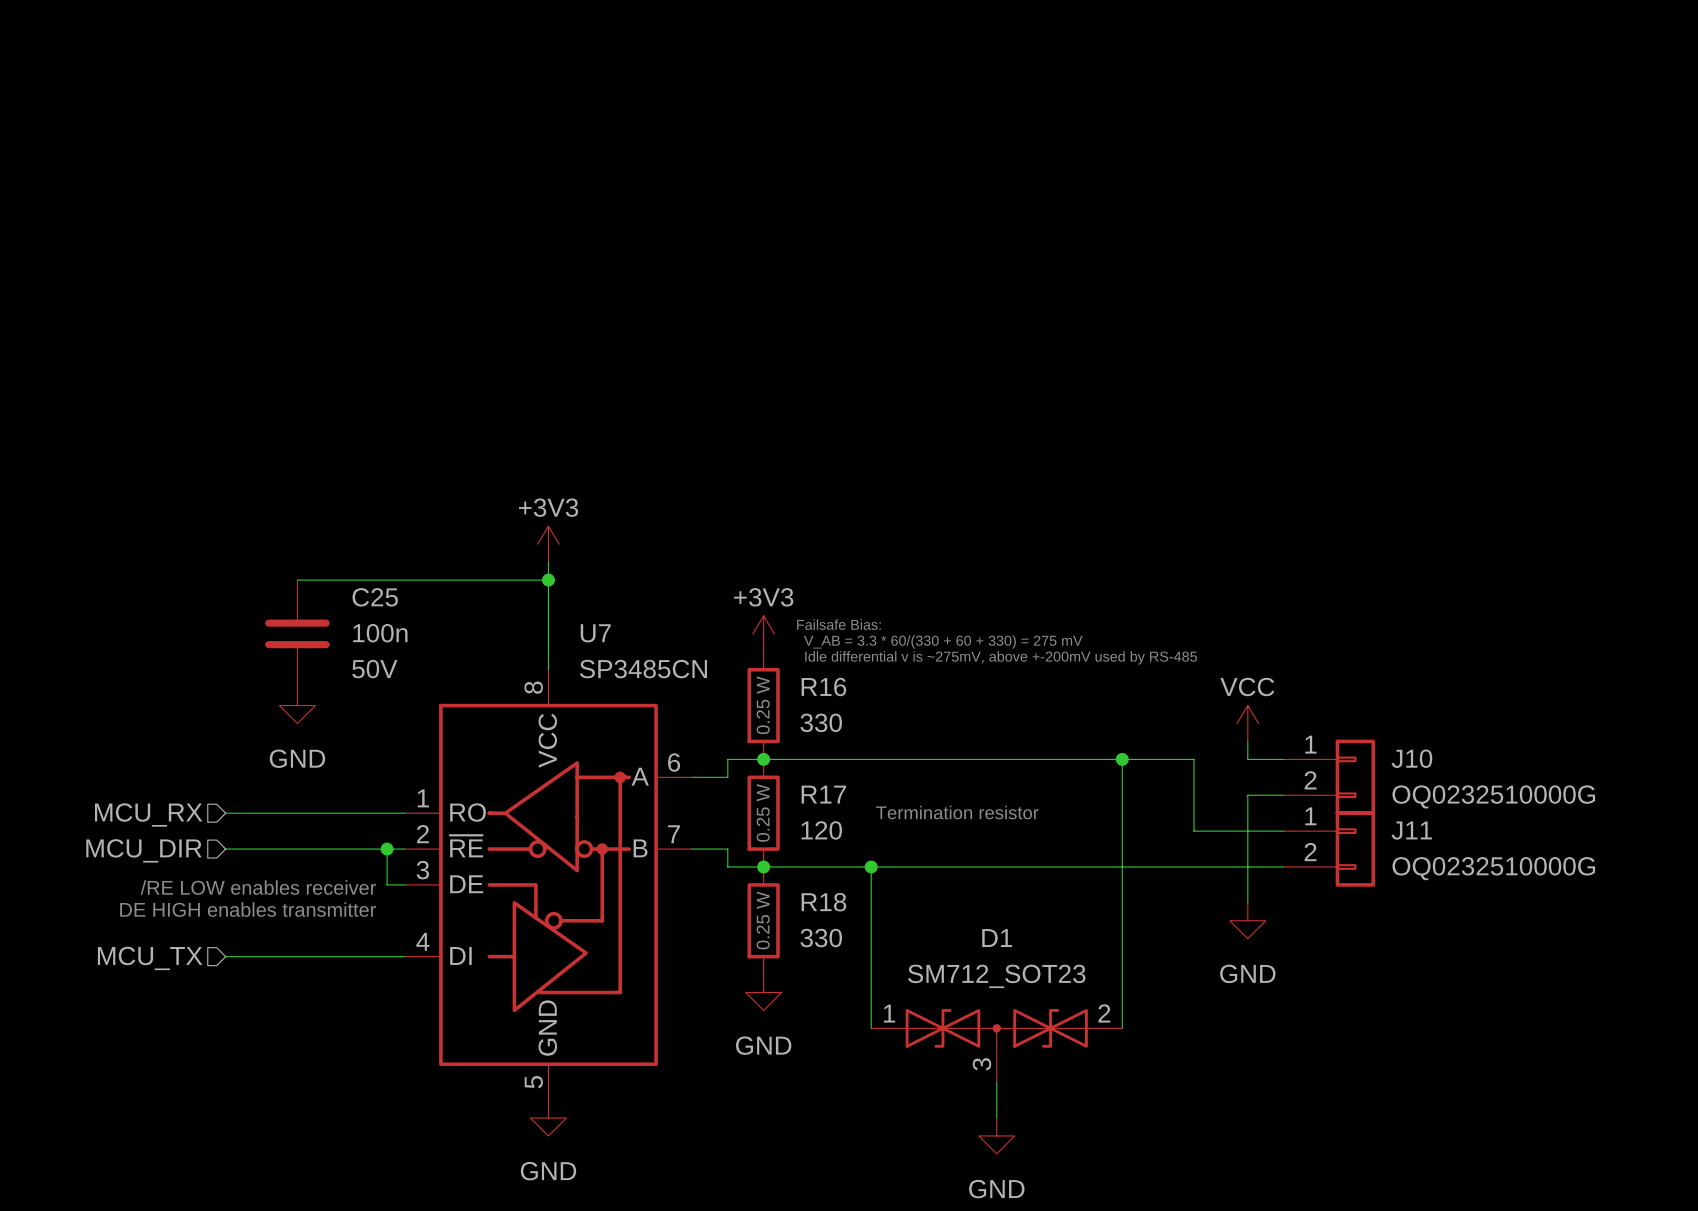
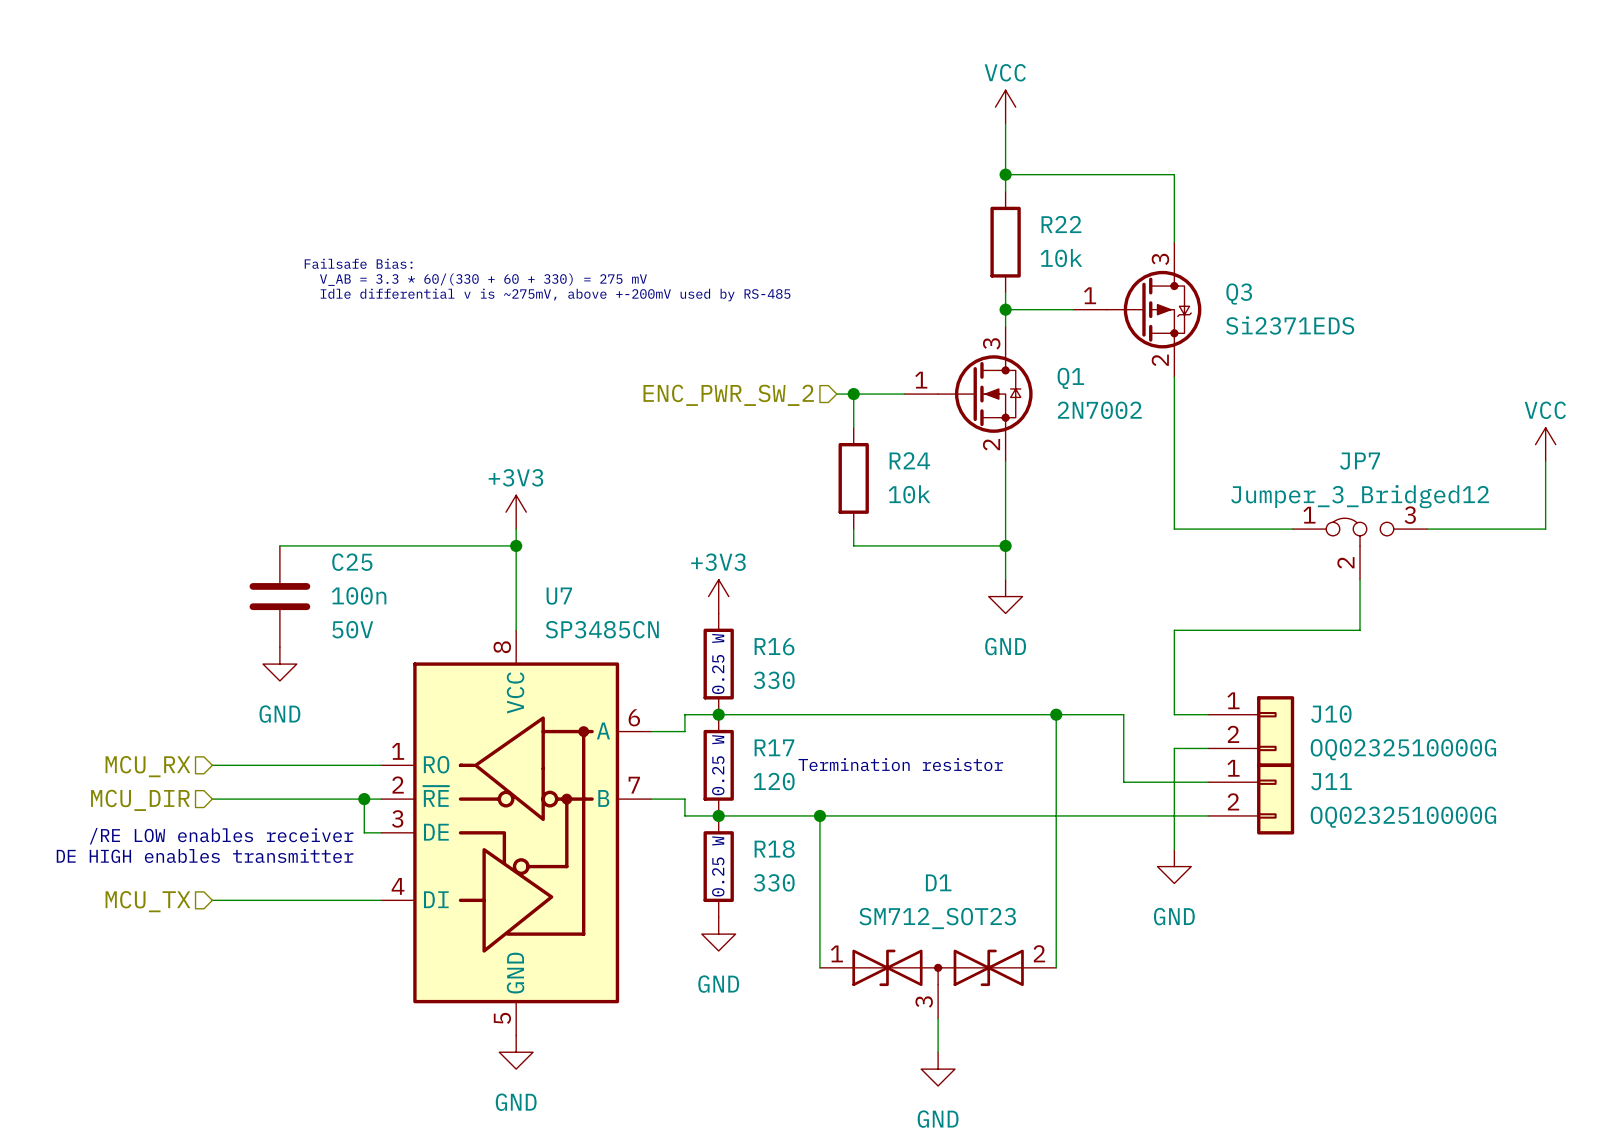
power symbol: none -> VCC (1005, 107)
wire: none -> (1005, 124) (1005, 191)
wire: none -> (1005, 174) (1174, 174) (1174, 242)
junction: none -> (1005, 174)
R22: none -> 10k (1005, 242)
text: none -> Failsafe Bias: (358, 263)
text: none -> V_AB = 3.3 * 60/(330 + 60 + 330) = 275 mV (483, 279)
wire: none -> (1005, 292) (1005, 326)
text: none -> Idle differential v is ~275mV, above +-200mV used by RS-485 (555, 294)
wire: none -> (1005, 309) (1073, 309)
junction: none -> (1005, 309)
Q3: none -> Si2371EDS (1137, 309)
wire: none -> (1174, 377) (1174, 529) (1292, 529)
wire: none -> (836, 394) (904, 394)
wire: none -> (853, 394) (853, 427)
junction: none -> (853, 394)
Q1: none -> 2N7002 (968, 394)
hierarchical label: none -> ENC_PWR_SW_2 (728, 395)
power symbol: none -> VCC (1545, 444)
wire: none -> (1005, 461) (1005, 579)
wire: none -> (1545, 461) (1545, 529) (1427, 529)
R24: none -> 10k (853, 478)
wire: none -> (853, 529) (853, 545) (1005, 545)
junction: none -> (1005, 545)
JP7: none -> Jumper_3_Bridged12 (1360, 548)
wire: none -> (1360, 579) (1360, 630) (1174, 630) (1174, 697)
text: Failsafe Bias: (838, 624) -> none
power symbol: none -> GND (1005, 596)
text: V_AB = 3.3 * 60/(330 + 60 + 330) = 275 mV (943, 641) -> none
text: Idle differential v is ~275mV, above +-200mV used by RS-485 (1001, 657) -> none
power symbol: VCC (1247, 723) -> none

